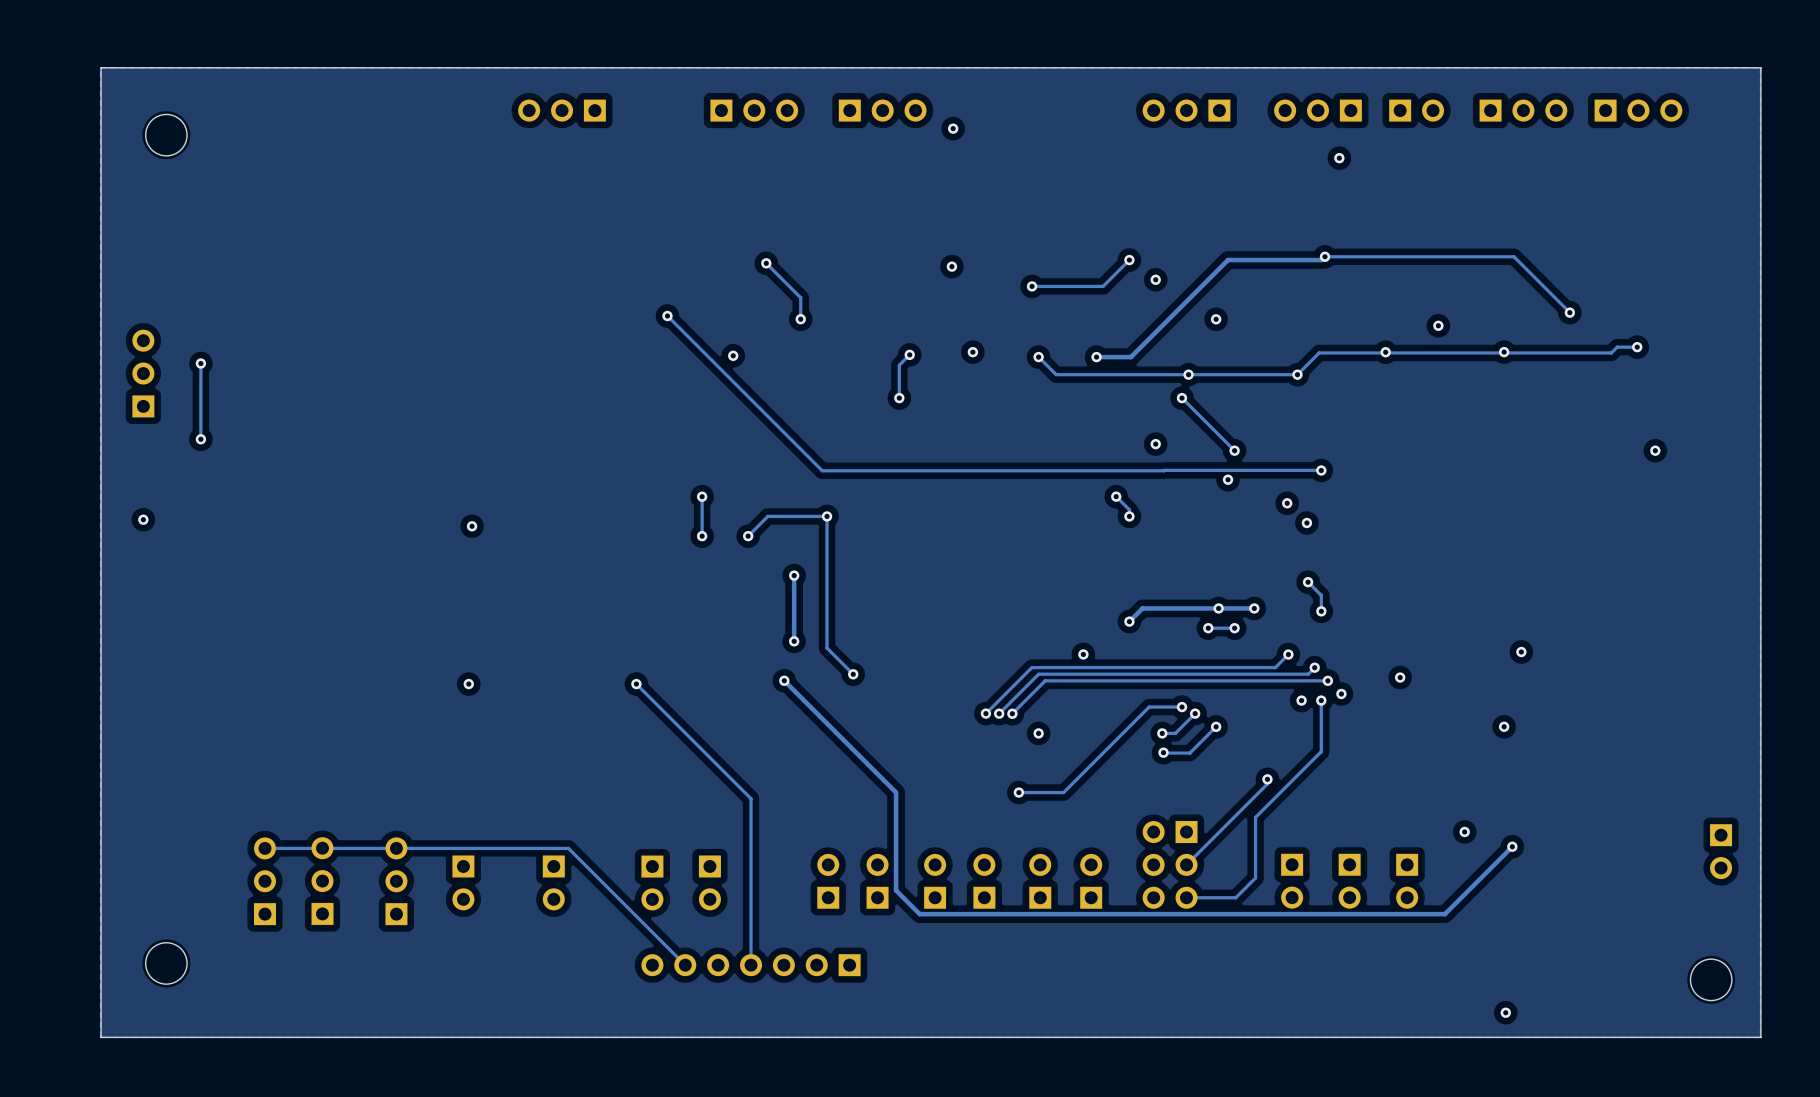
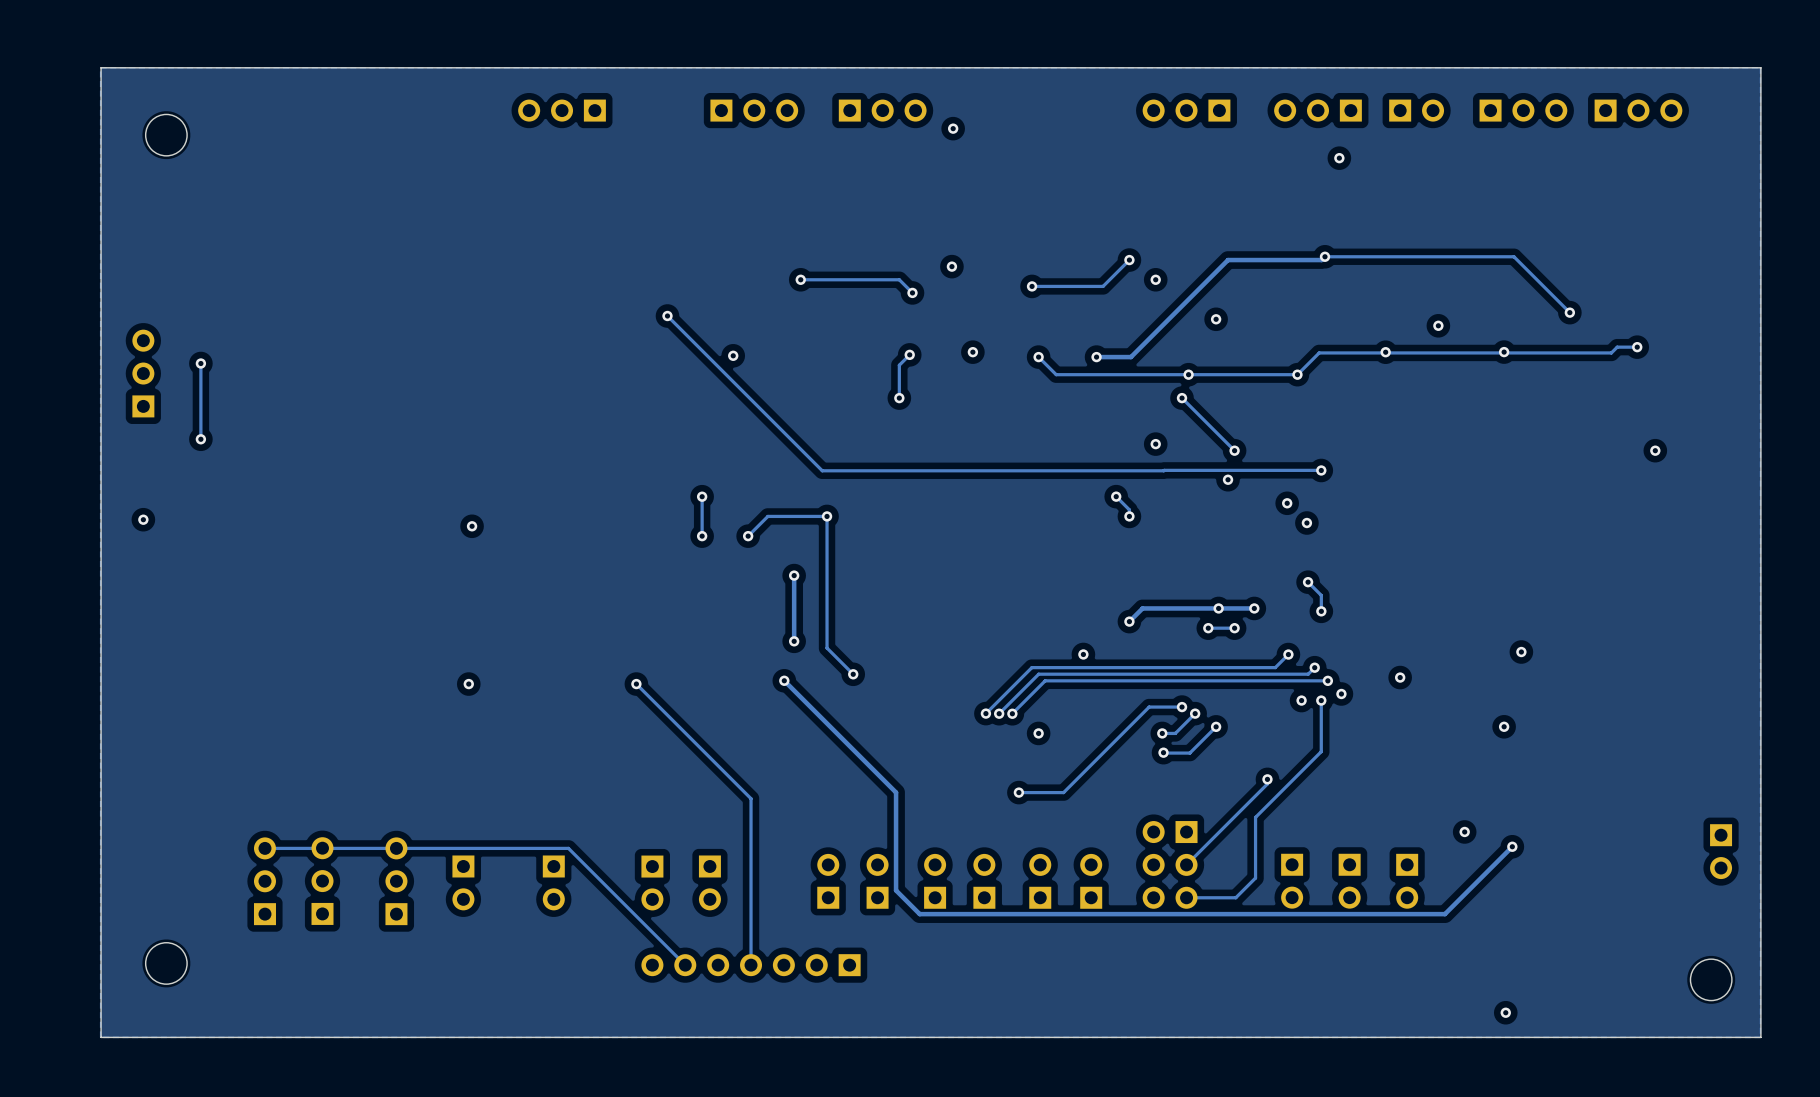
track: (766, 263) (800, 297) (800, 319) -> none
via: (766, 263) -> none
track: none -> (800, 279) (899, 279) (912, 292)
via: none -> (800, 279)
via: none -> (912, 292)
via: (800, 319) -> none

